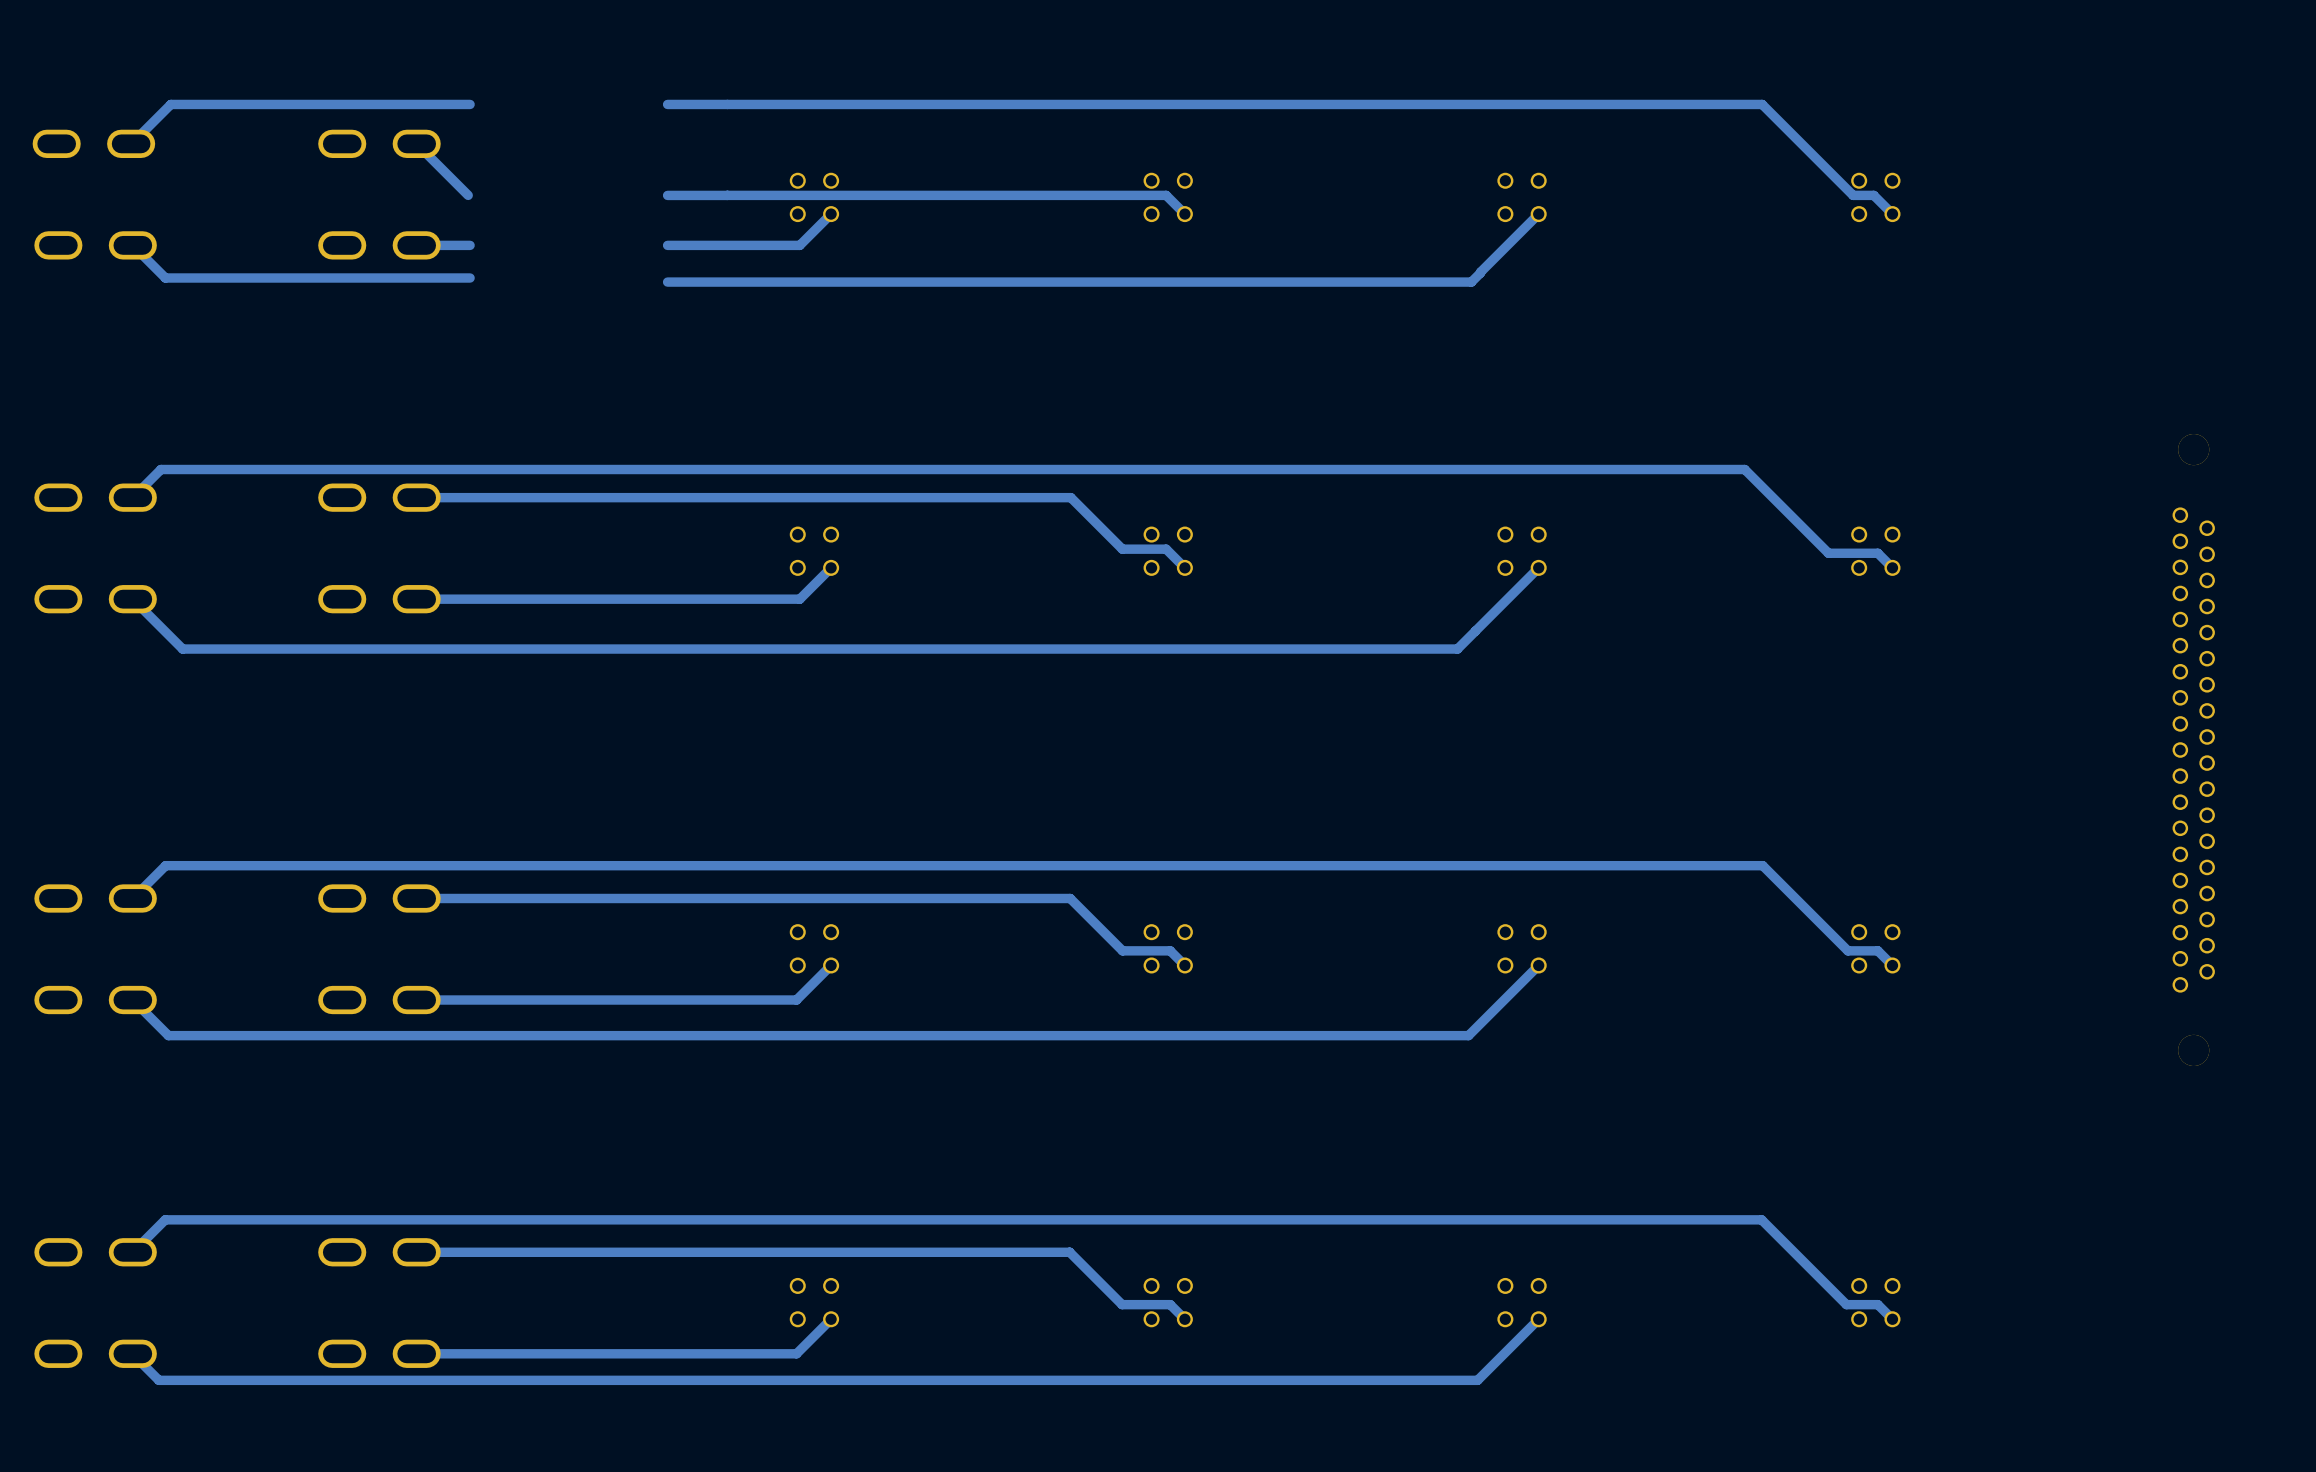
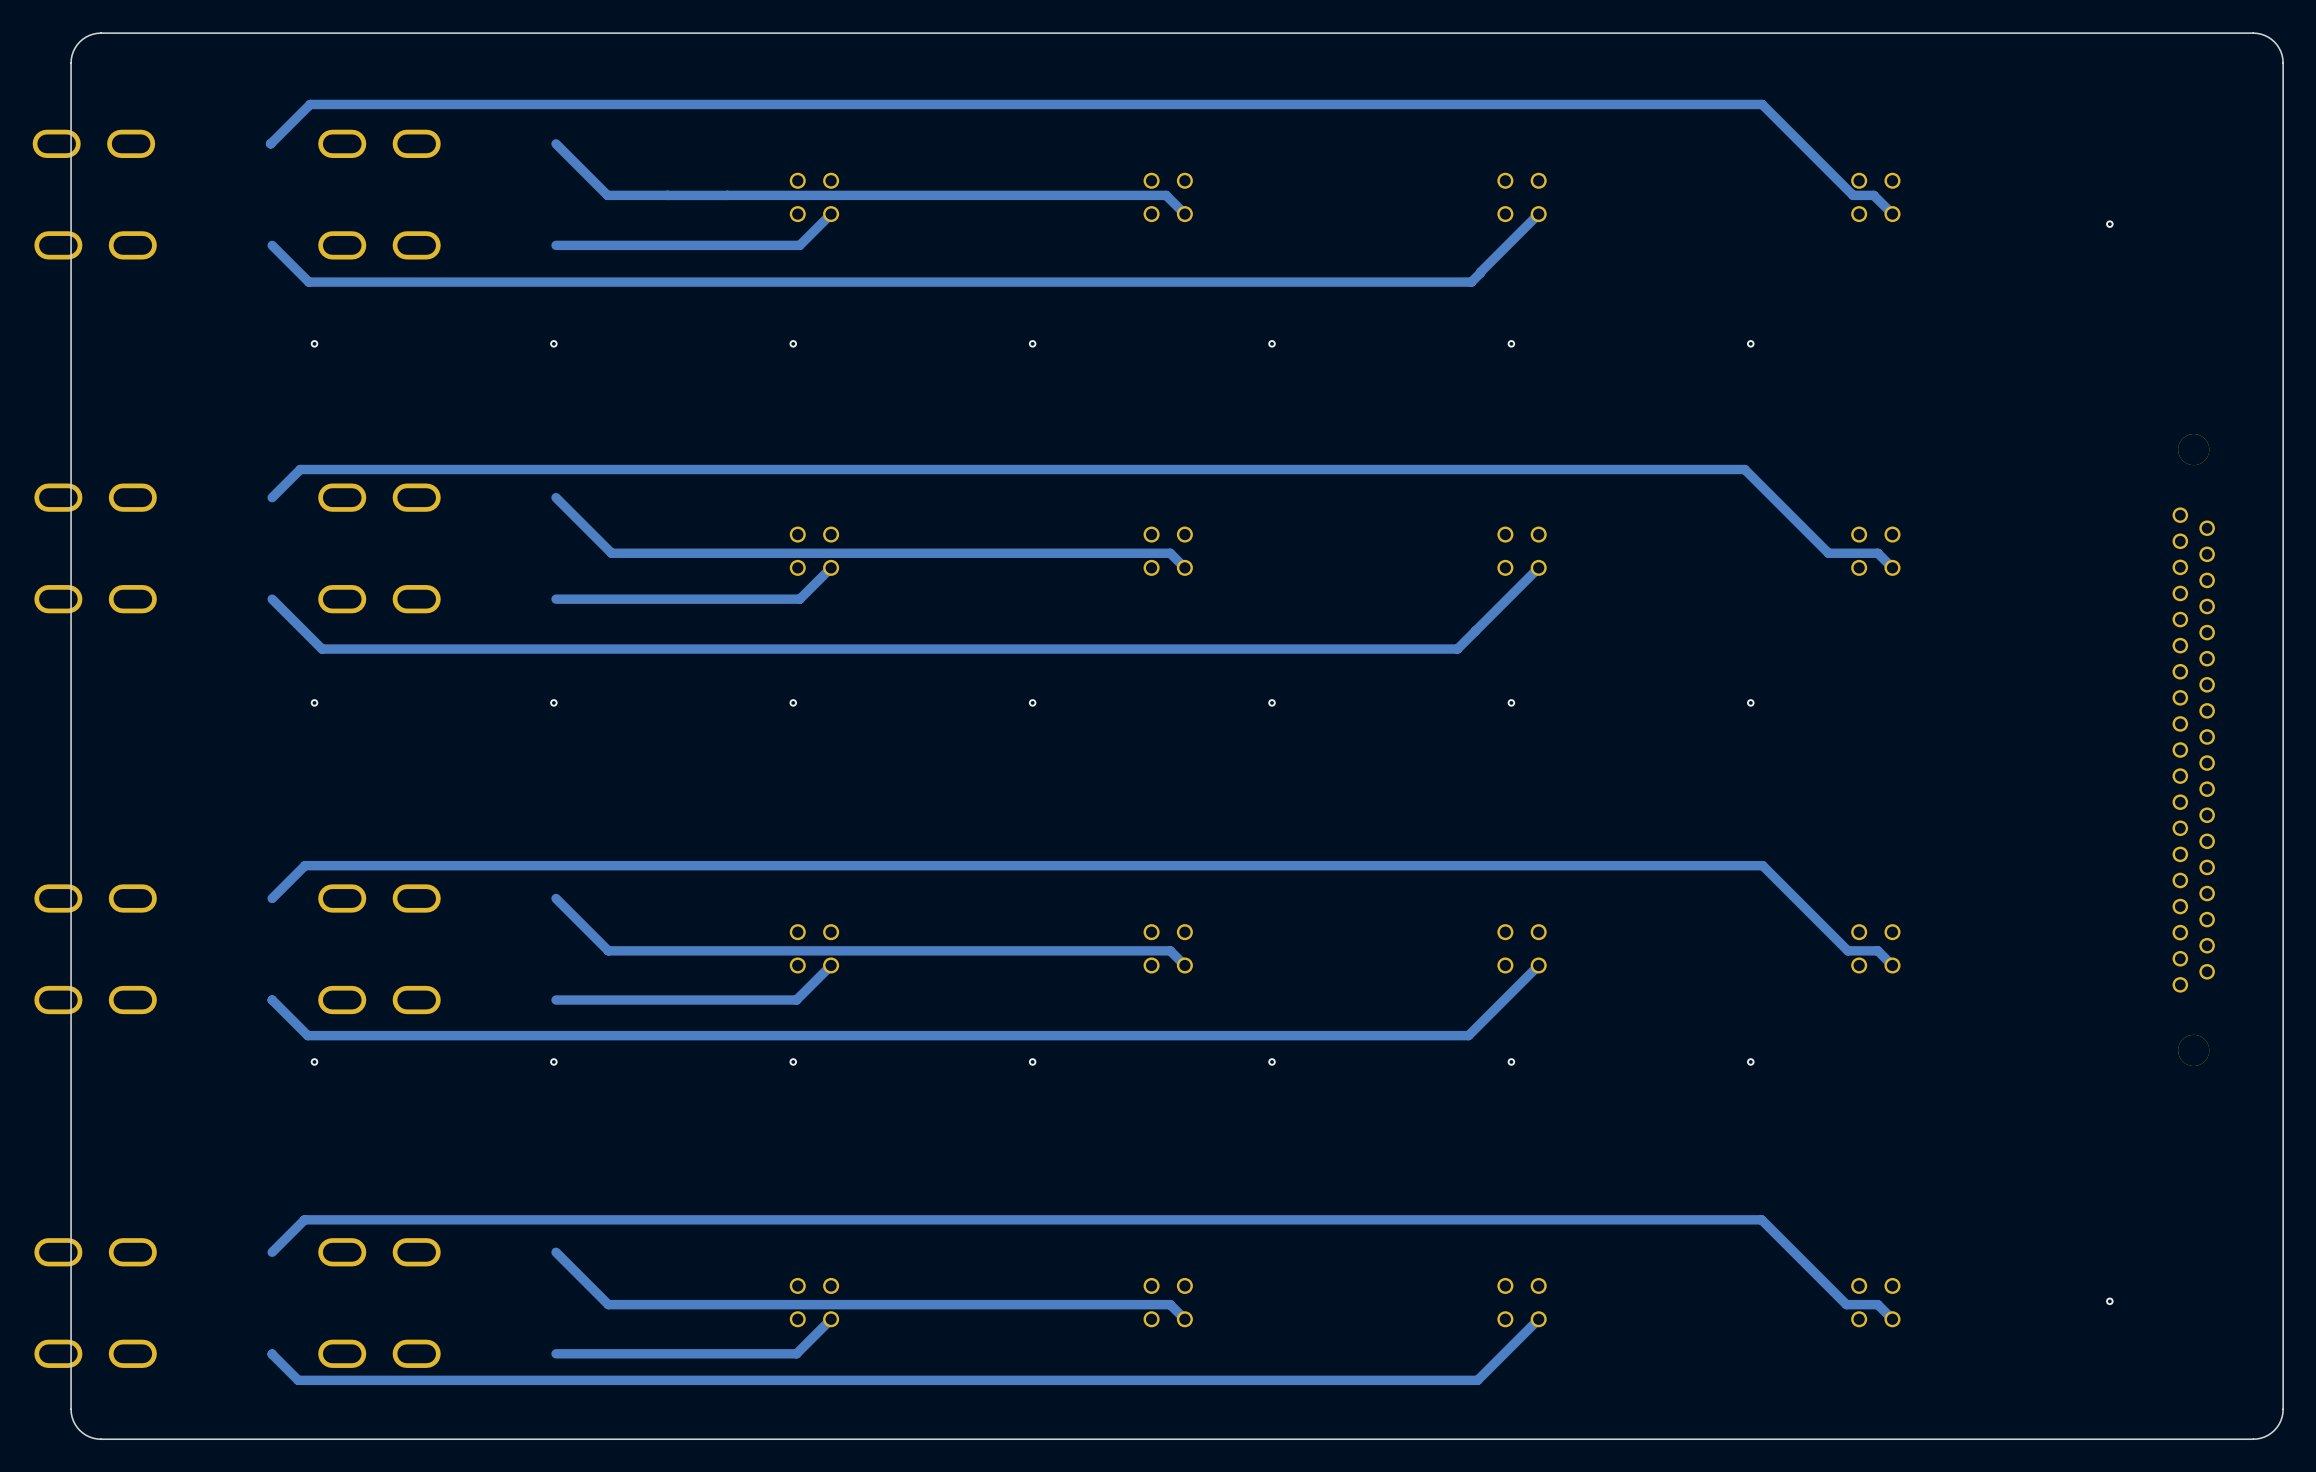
board edge: none -> (2253, 33) (100, 33) (86, 37) (75, 48) (71, 63) (71, 1409) (75, 1424) (86, 1435) (100, 1439) (2253, 1439) (2268, 1435) (2279, 1424) (2283, 1409) (2283, 63) (2280, 51) (2274, 41) (2264, 35) (2253, 33)
track: (310, 104) (170, 104) (131, 143) -> (310, 104) (270, 143)
track: none -> (667, 104) (470, 104)
track: (416, 143) (468, 195) -> none
track: none -> (556, 143) (607, 195) (667, 195)
via: none -> (2109, 224)
track: (132, 245) (165, 278) (470, 278) -> none
track: none -> (272, 245) (308, 282) (667, 282)
track: (470, 245) (416, 245) -> none
track: none -> (667, 245) (556, 245)
via: none -> (314, 343)
via: none -> (553, 343)
via: none -> (793, 343)
via: none -> (1032, 343)
via: none -> (1272, 343)
via: none -> (1511, 343)
via: none -> (1750, 343)
track: (300, 469) (160, 469) (132, 497) -> (300, 469) (272, 497)
track: (416, 497) (1070, 497) (1122, 549) (1166, 549) (1170, 553) -> (556, 497) (611, 553) (1170, 553)
track: (132, 599) (182, 649) (322, 649) -> (272, 599) (322, 649)
track: (556, 599) (416, 599) -> none
via: none -> (314, 702)
via: none -> (553, 702)
via: none -> (793, 702)
via: none -> (1032, 702)
via: none -> (1272, 702)
via: none -> (1511, 702)
via: none -> (1750, 702)
track: (304, 865) (165, 865) (132, 898) -> (304, 865) (272, 898)
track: (416, 898) (1070, 898) (1122, 950) -> (556, 898) (608, 950) (1122, 950)
track: (132, 1000) (168, 1035) (307, 1035) -> (272, 1000) (307, 1035)
track: (556, 1000) (416, 1000) -> none
via: none -> (314, 1061)
via: none -> (553, 1061)
via: none -> (793, 1061)
via: none -> (1032, 1061)
via: none -> (1272, 1061)
via: none -> (1511, 1061)
via: none -> (1750, 1061)
track: (304, 1219) (165, 1219) (132, 1252) -> (304, 1219) (272, 1252)
track: (416, 1252) (1069, 1252) (1122, 1304) -> (556, 1252) (608, 1304) (1122, 1304)
via: none -> (2109, 1301)
track: (132, 1353) (158, 1380) (298, 1380) -> (272, 1353) (298, 1380)
track: (556, 1353) (416, 1353) -> none

